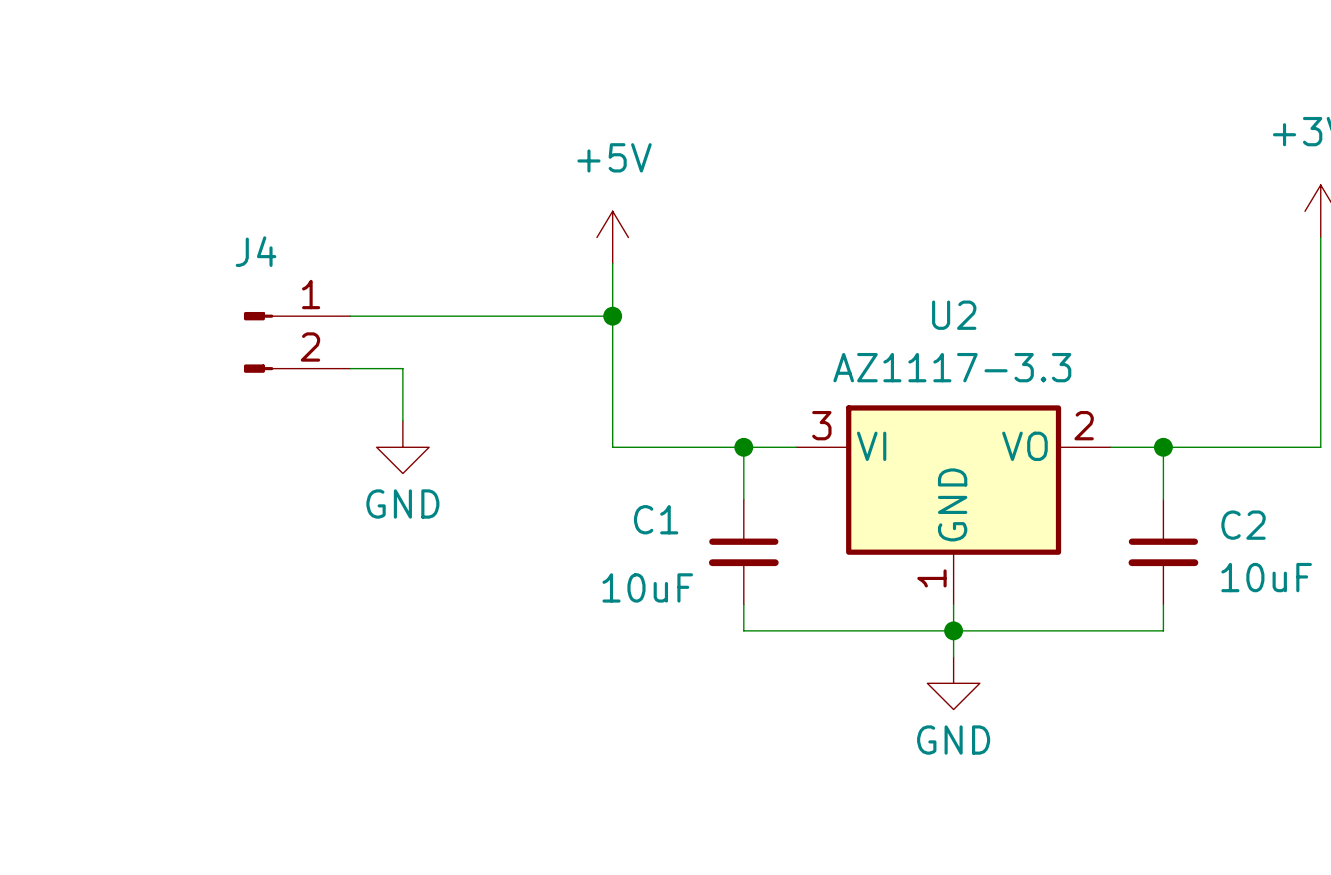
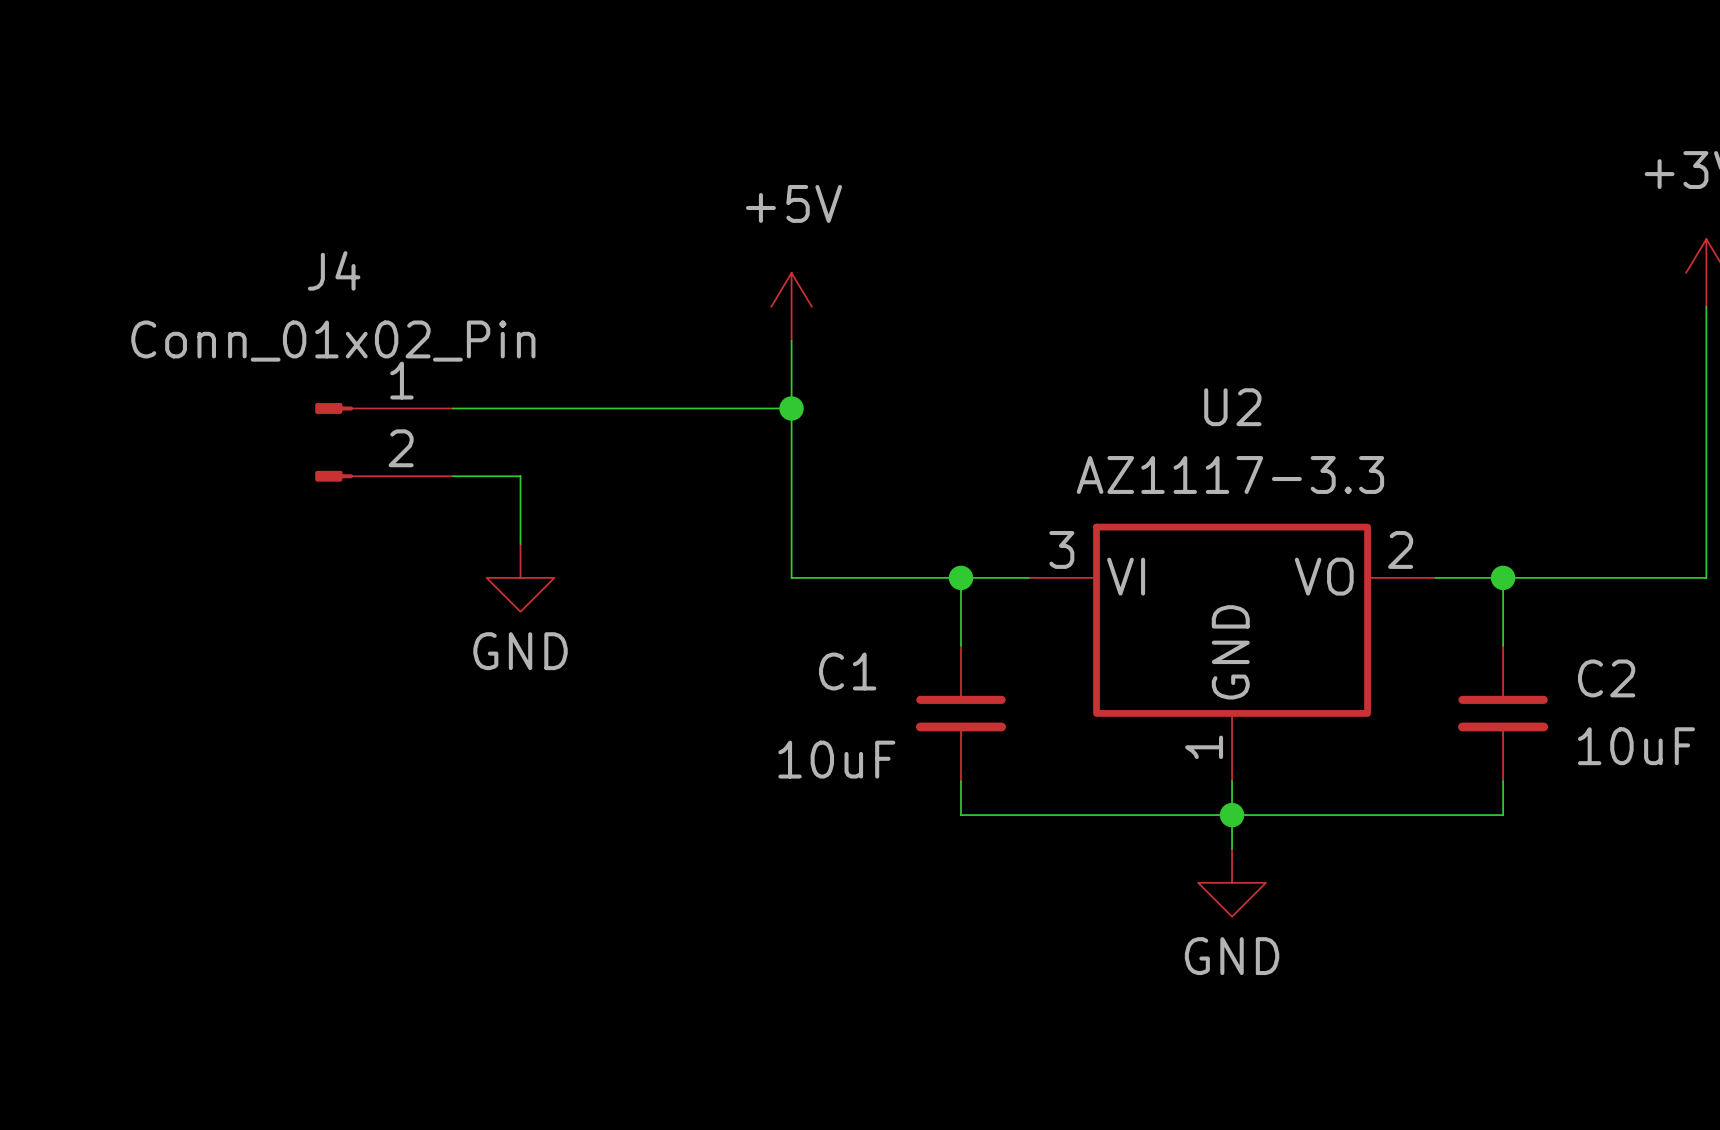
J4 name position: J4 (256, 251) -> J4 (334, 270)
J4 value: none -> Conn_01x02_Pin (333, 341)

